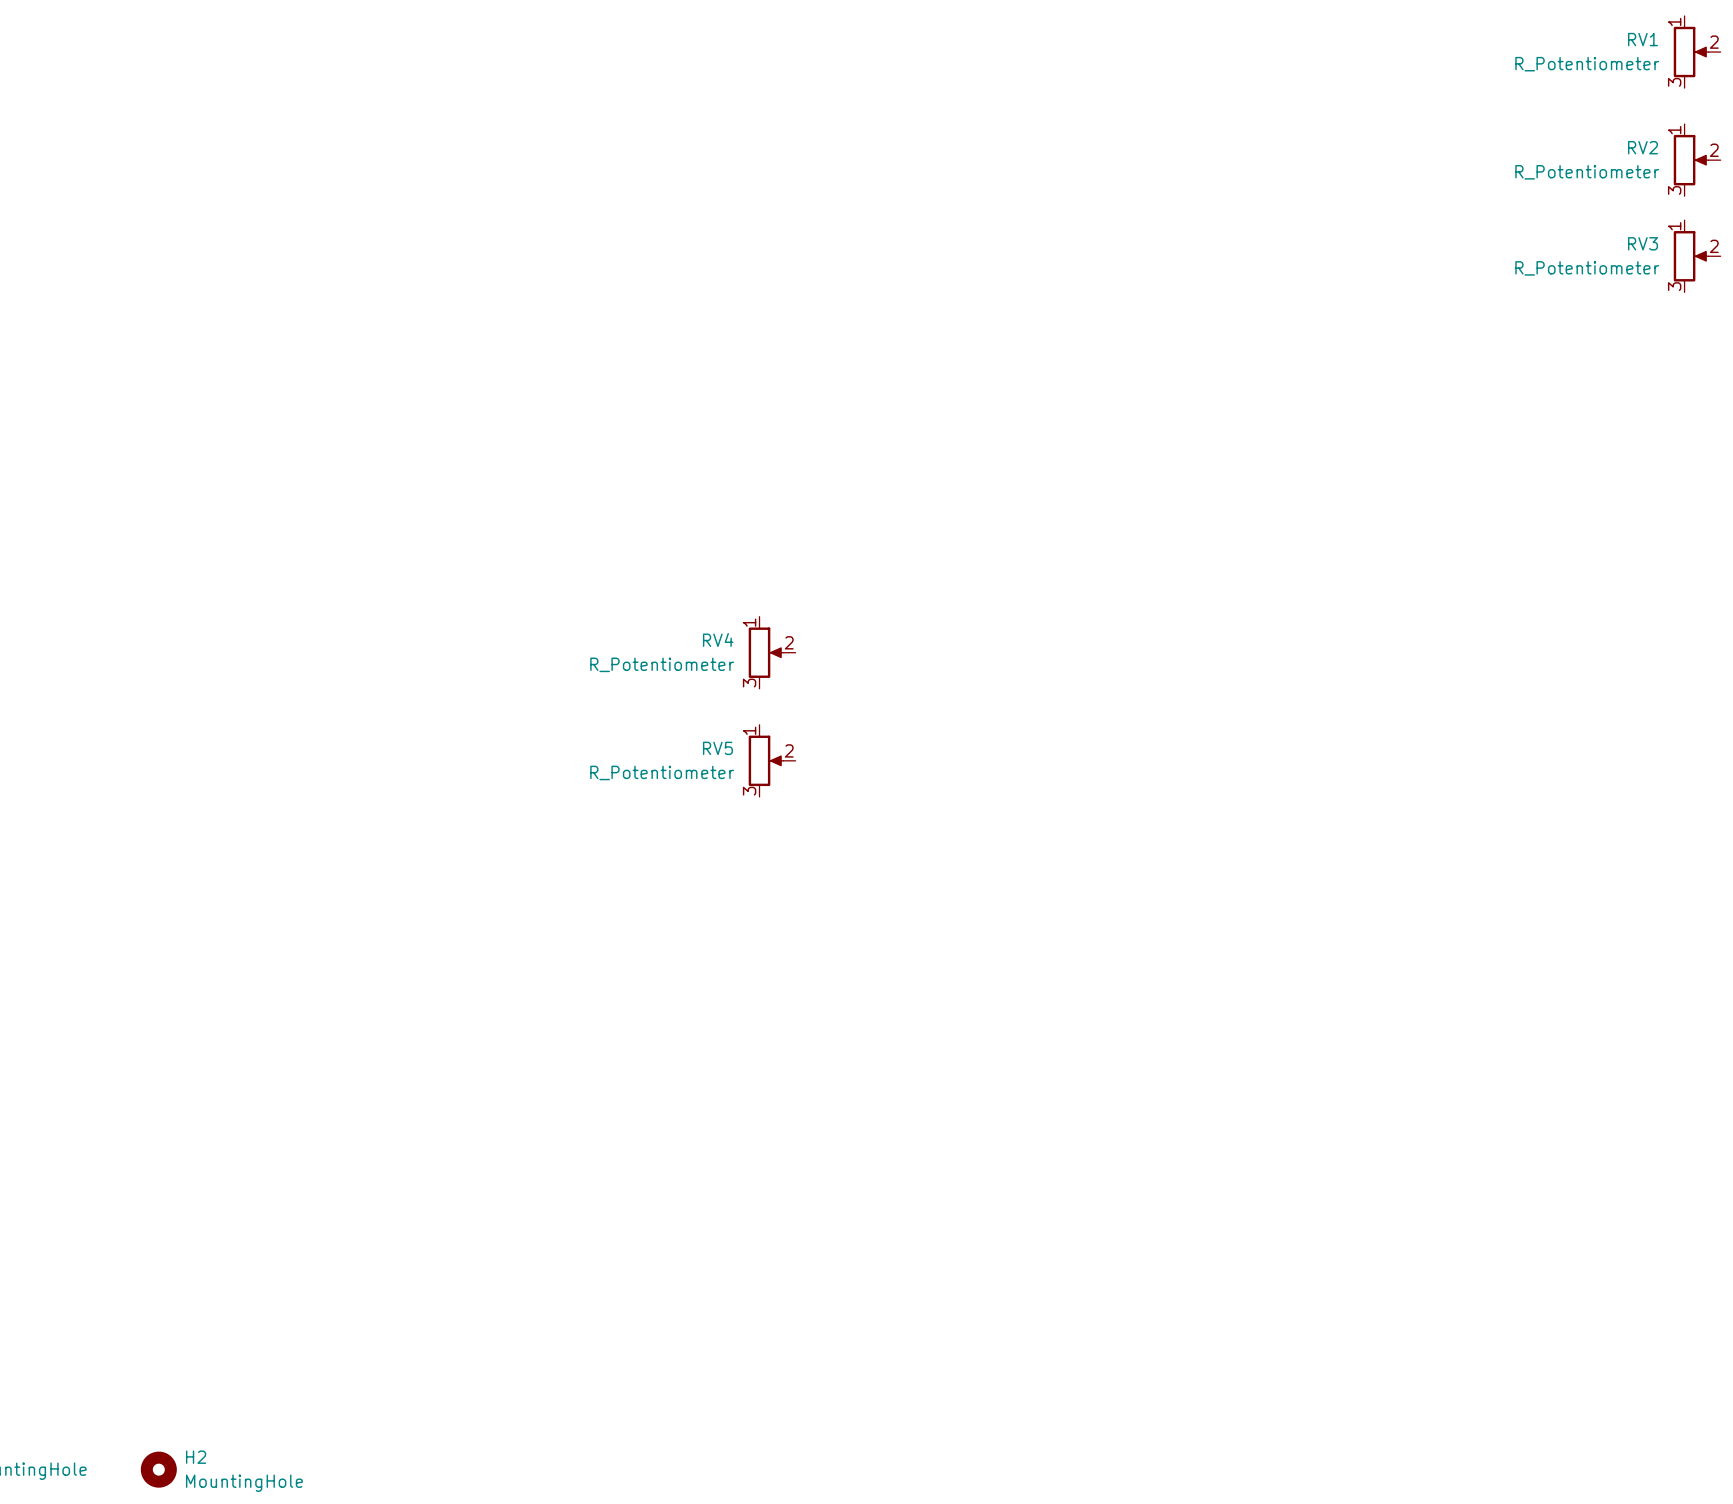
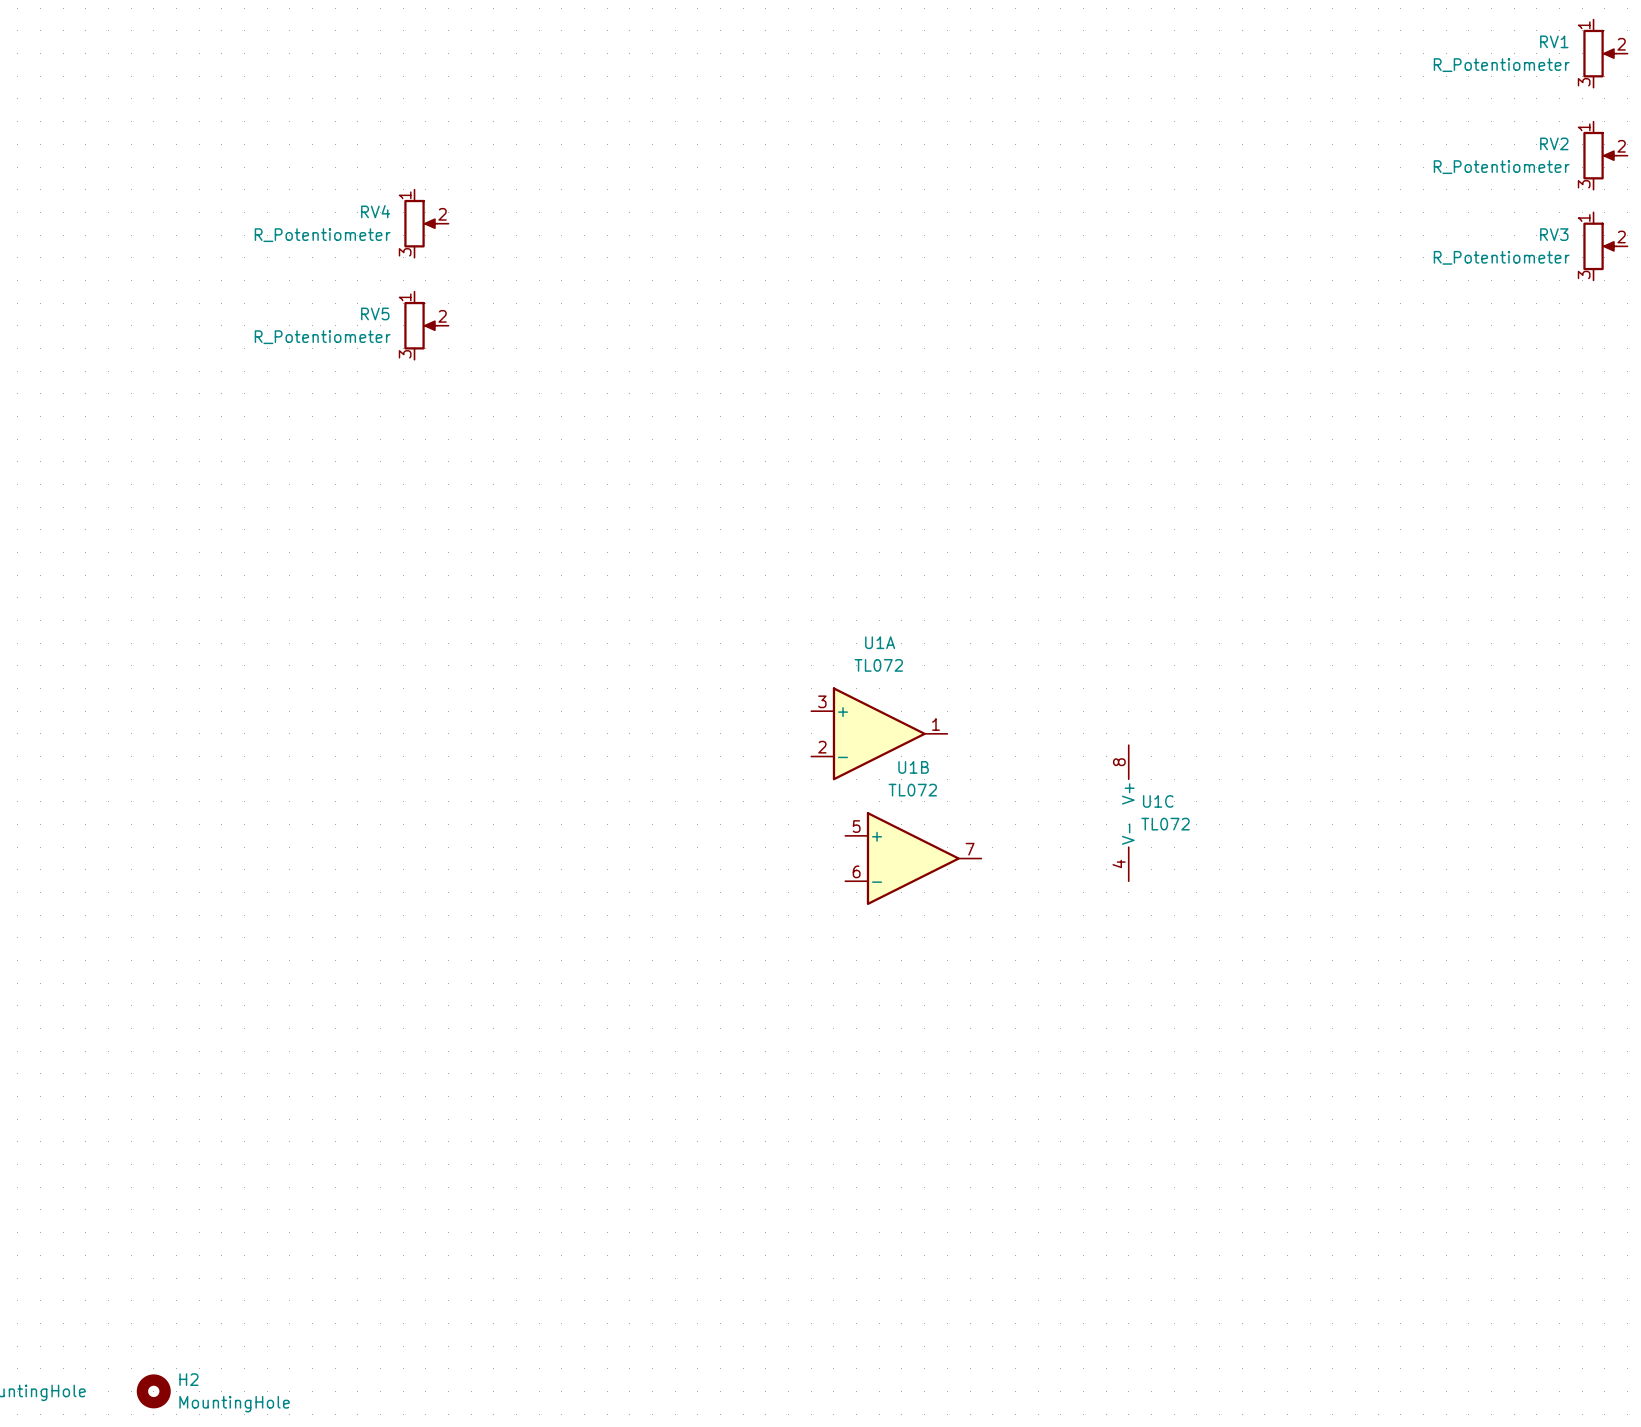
RV4 position: (772, 652) -> (426, 223)
RV5 position: (772, 760) -> (426, 325)
U1A: none -> TL072 (879, 733)
U1C: none -> TL072 (1128, 813)
U1B: none -> TL072 (913, 858)

